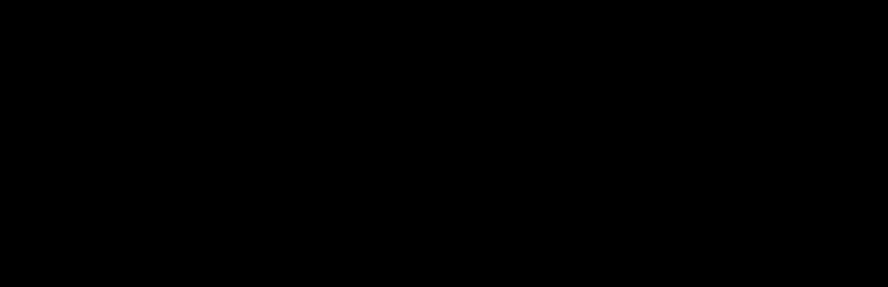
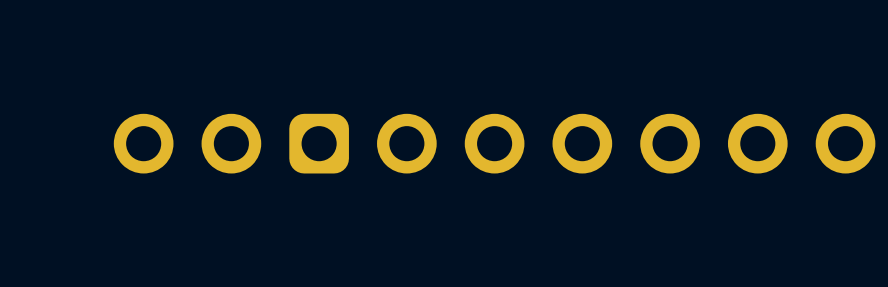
part: none -> (494, 143)

